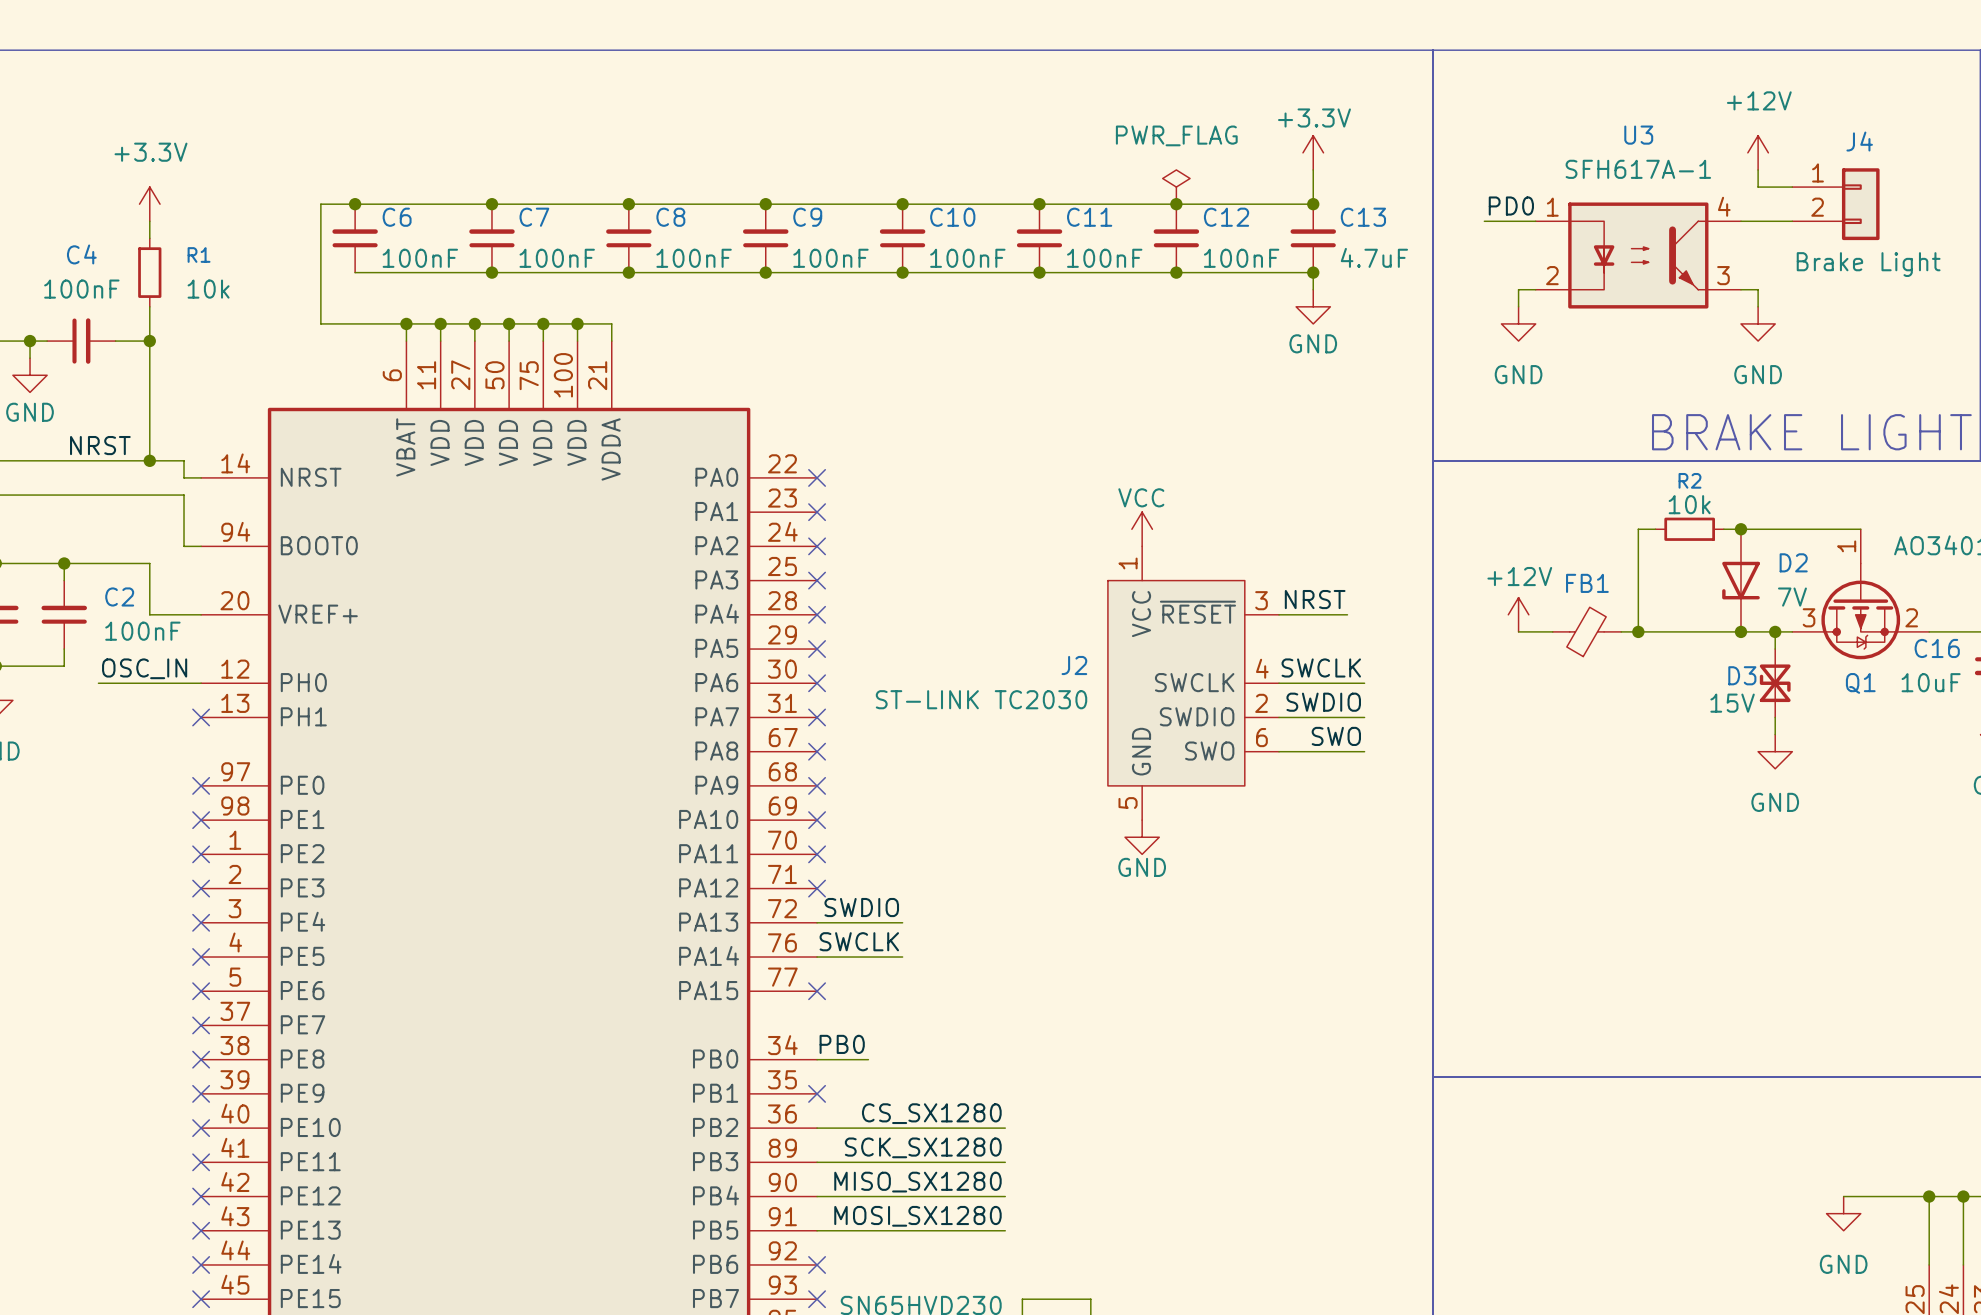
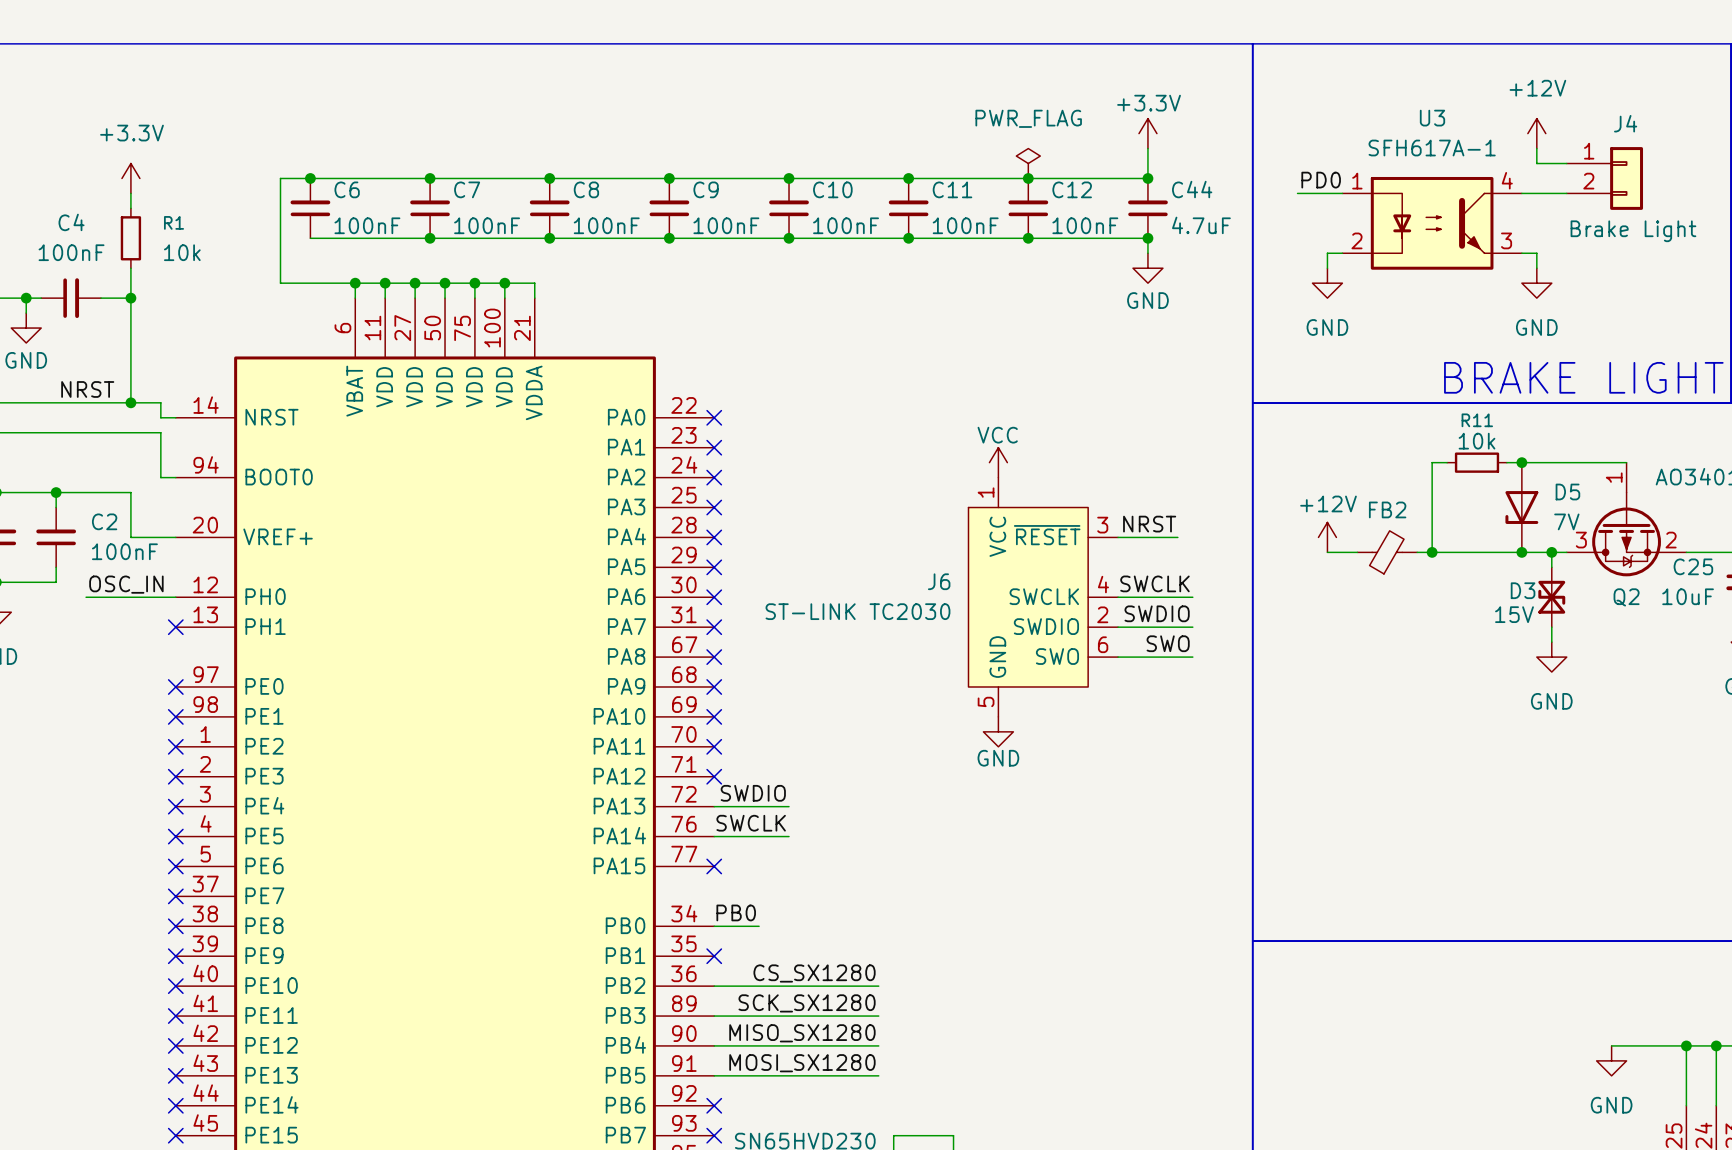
C13 name: C13 (1363, 217) -> C44 (1192, 189)
R2 name: R2 (1689, 480) -> R11 (1477, 420)
D2 name: D2 (1793, 562) -> D5 (1567, 492)
FB1 name: FB1 (1587, 583) -> FB2 (1387, 509)
C16 name: C16 (1937, 648) -> C25 (1693, 566)
J2 name: J2 (1074, 665) -> J6 (939, 581)
Q1 name: Q1 (1860, 683) -> Q2 (1626, 597)

